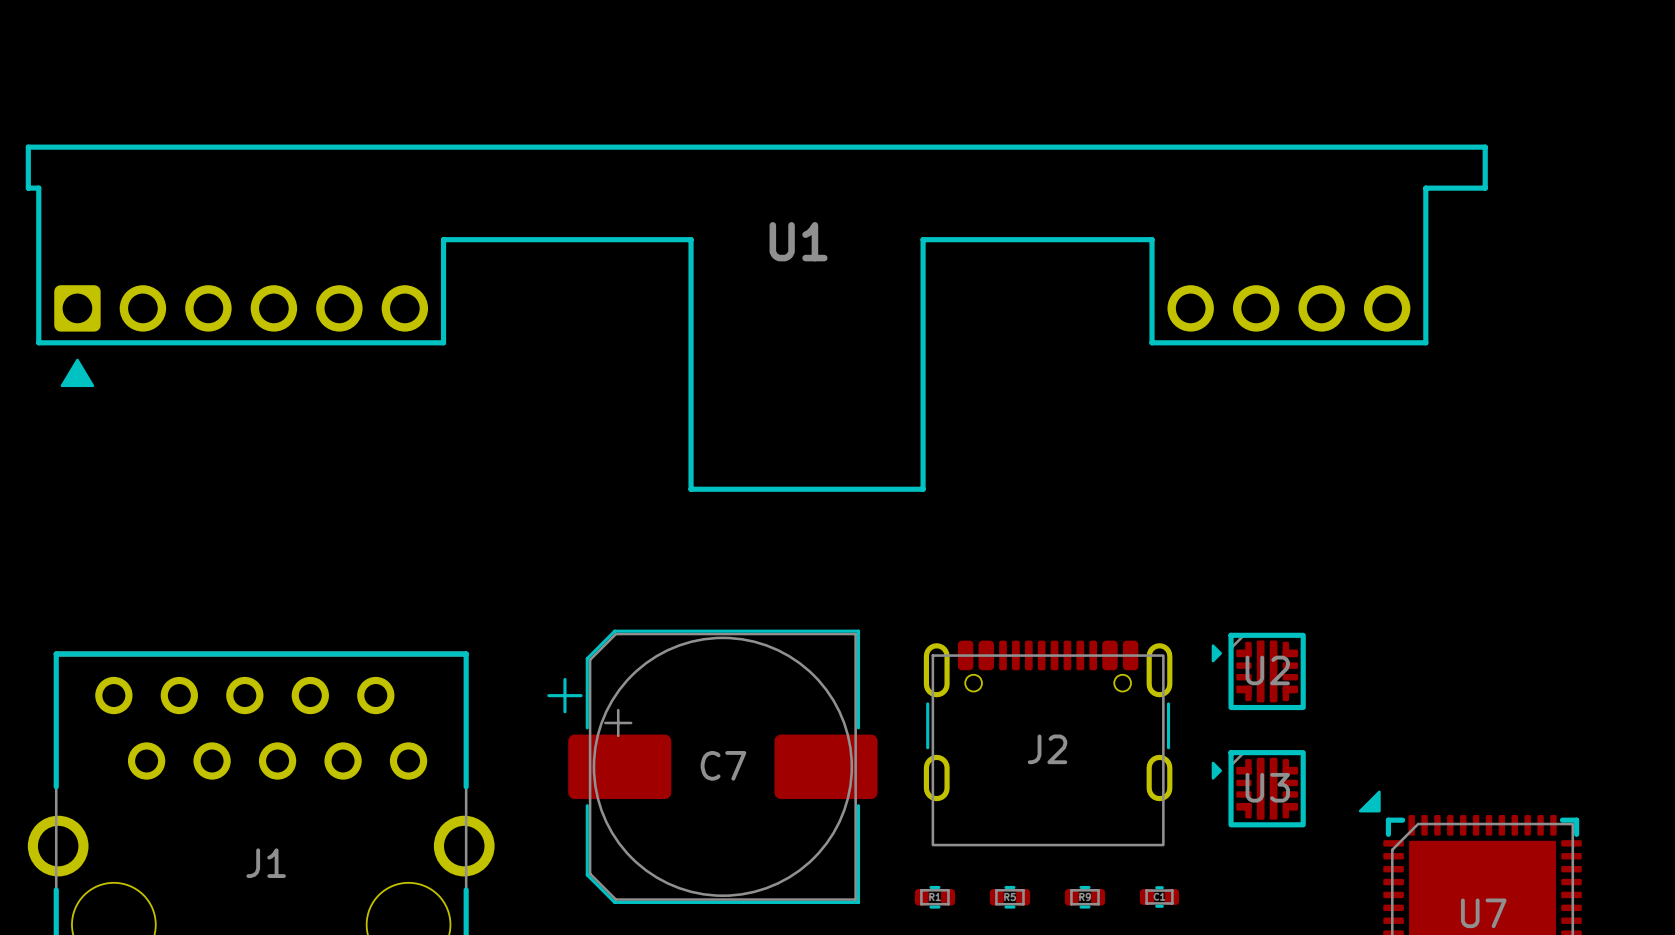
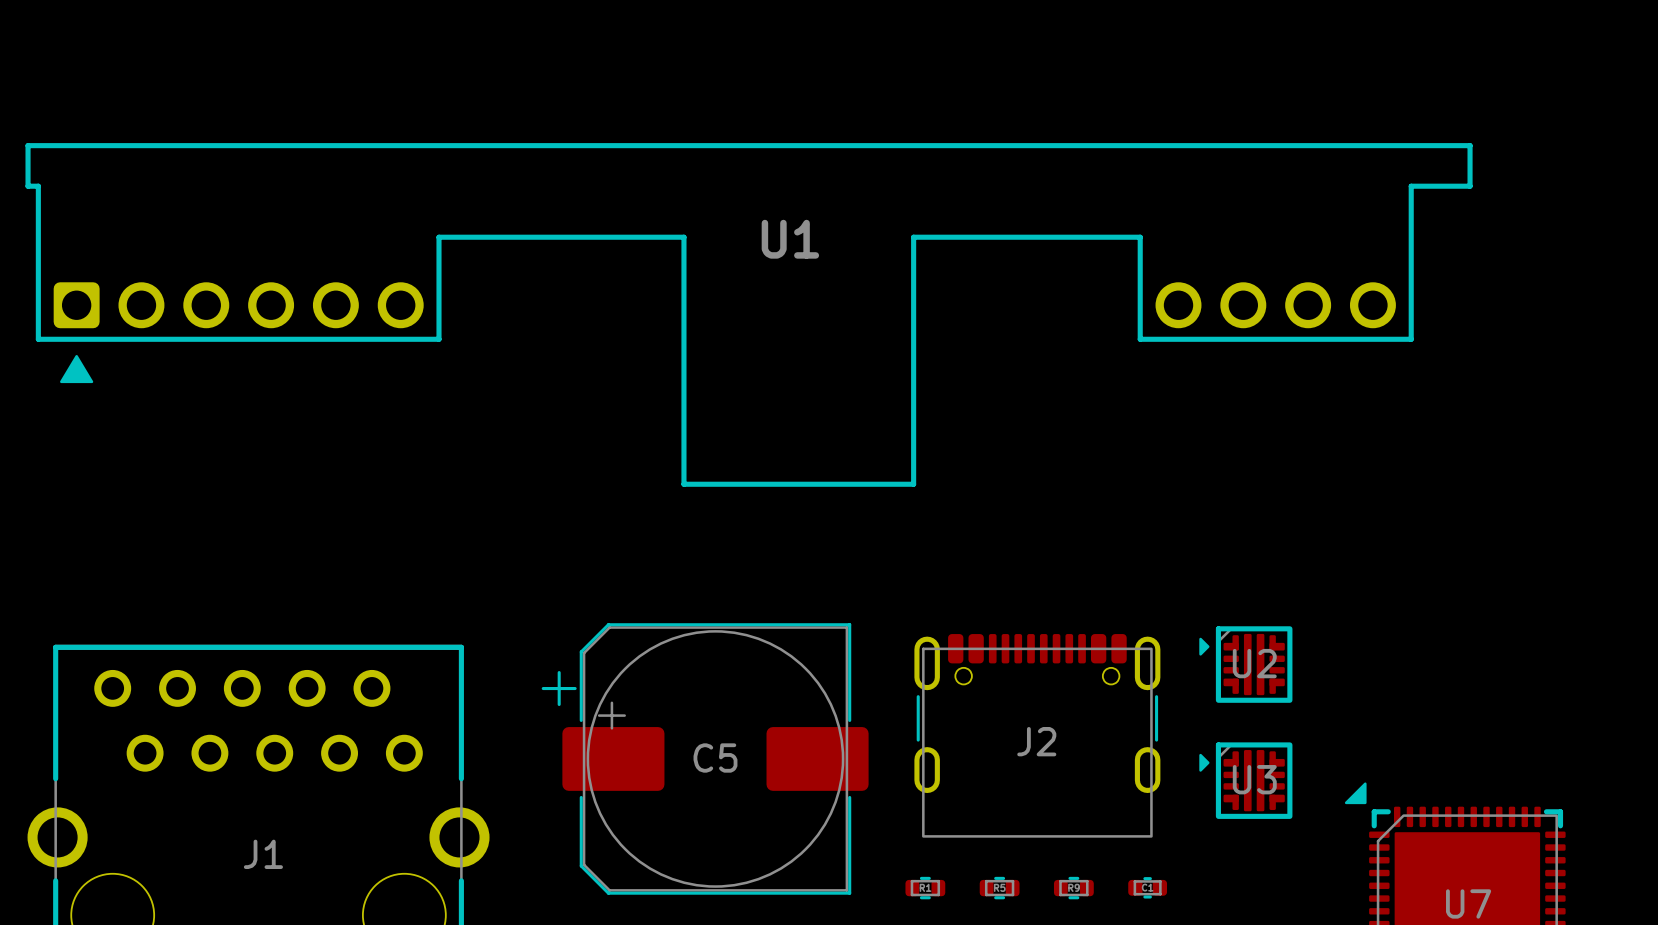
C7 name: C7 (723, 765) -> C5 (715, 758)

